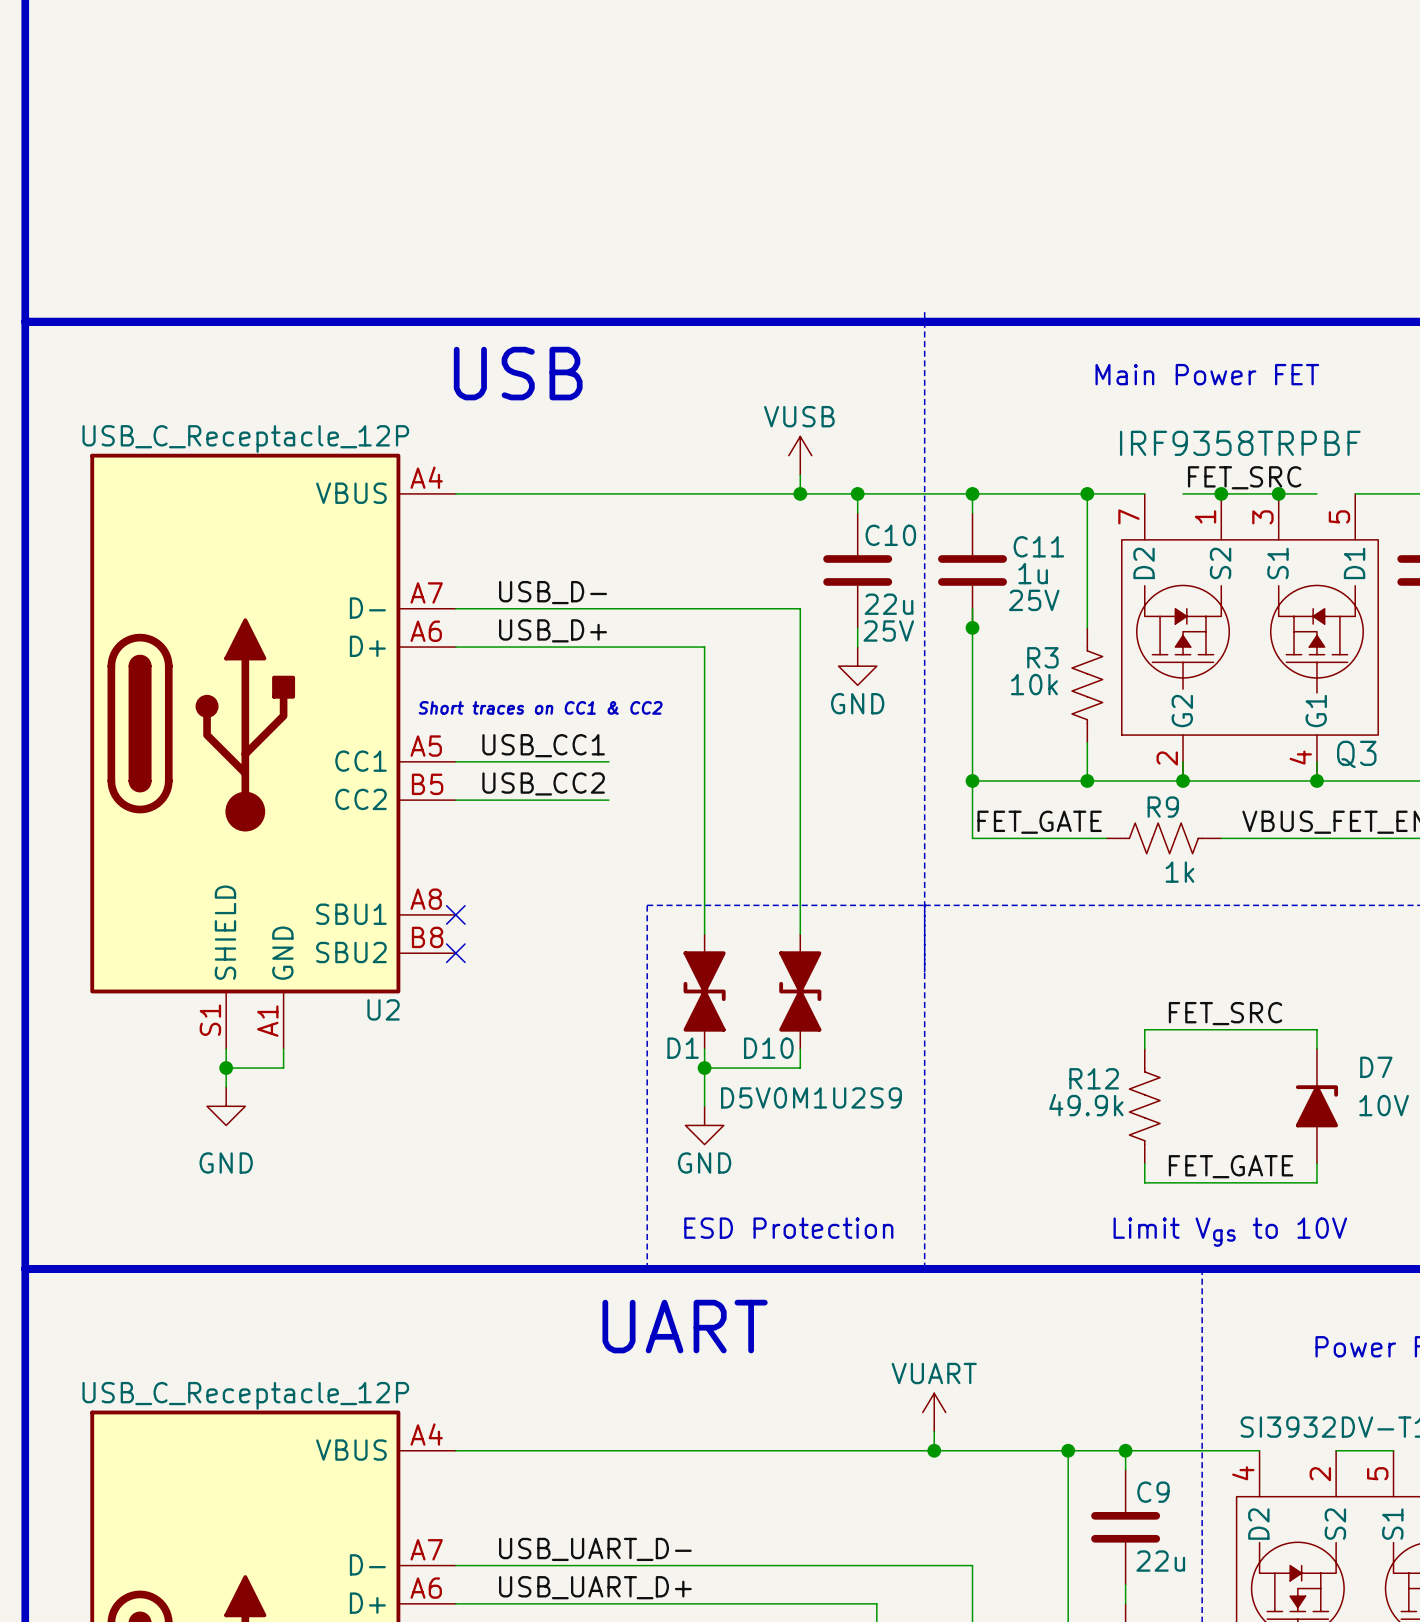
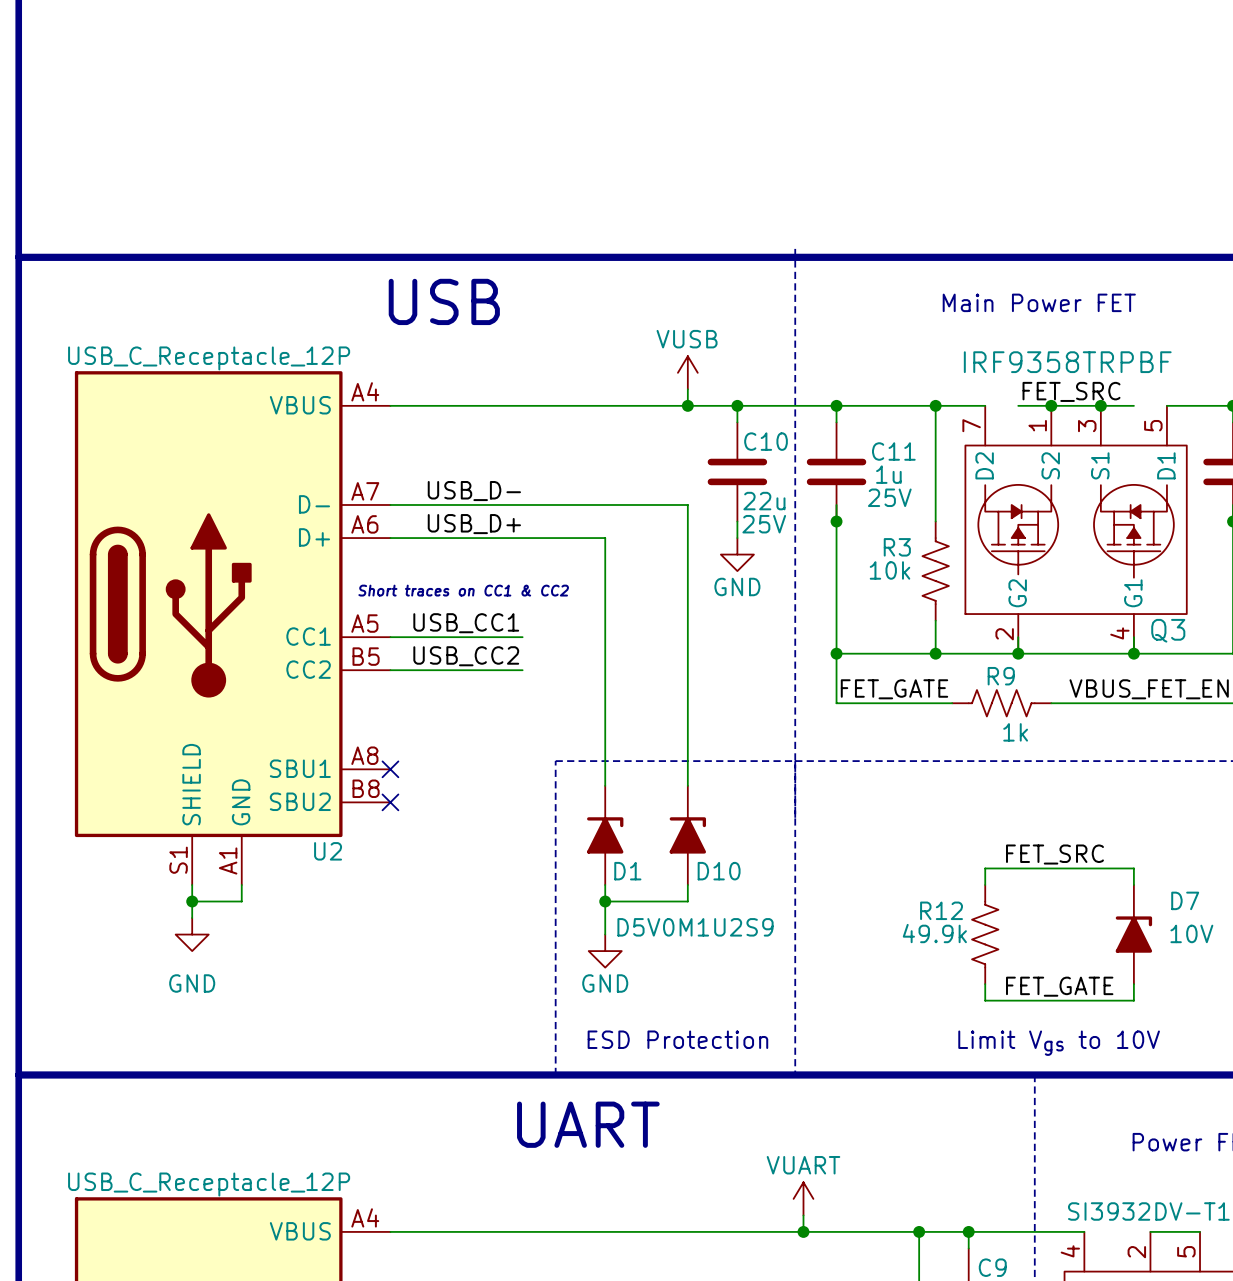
D1 symbol: [683, 934, 726, 1049] -> [587, 785, 624, 885]
D10 symbol: [779, 934, 822, 1049] -> [669, 785, 707, 885]
D1 name position: D1 (683, 1048) -> D1 (627, 871)
D10 name position: D10 (768, 1048) -> D10 (719, 871)

